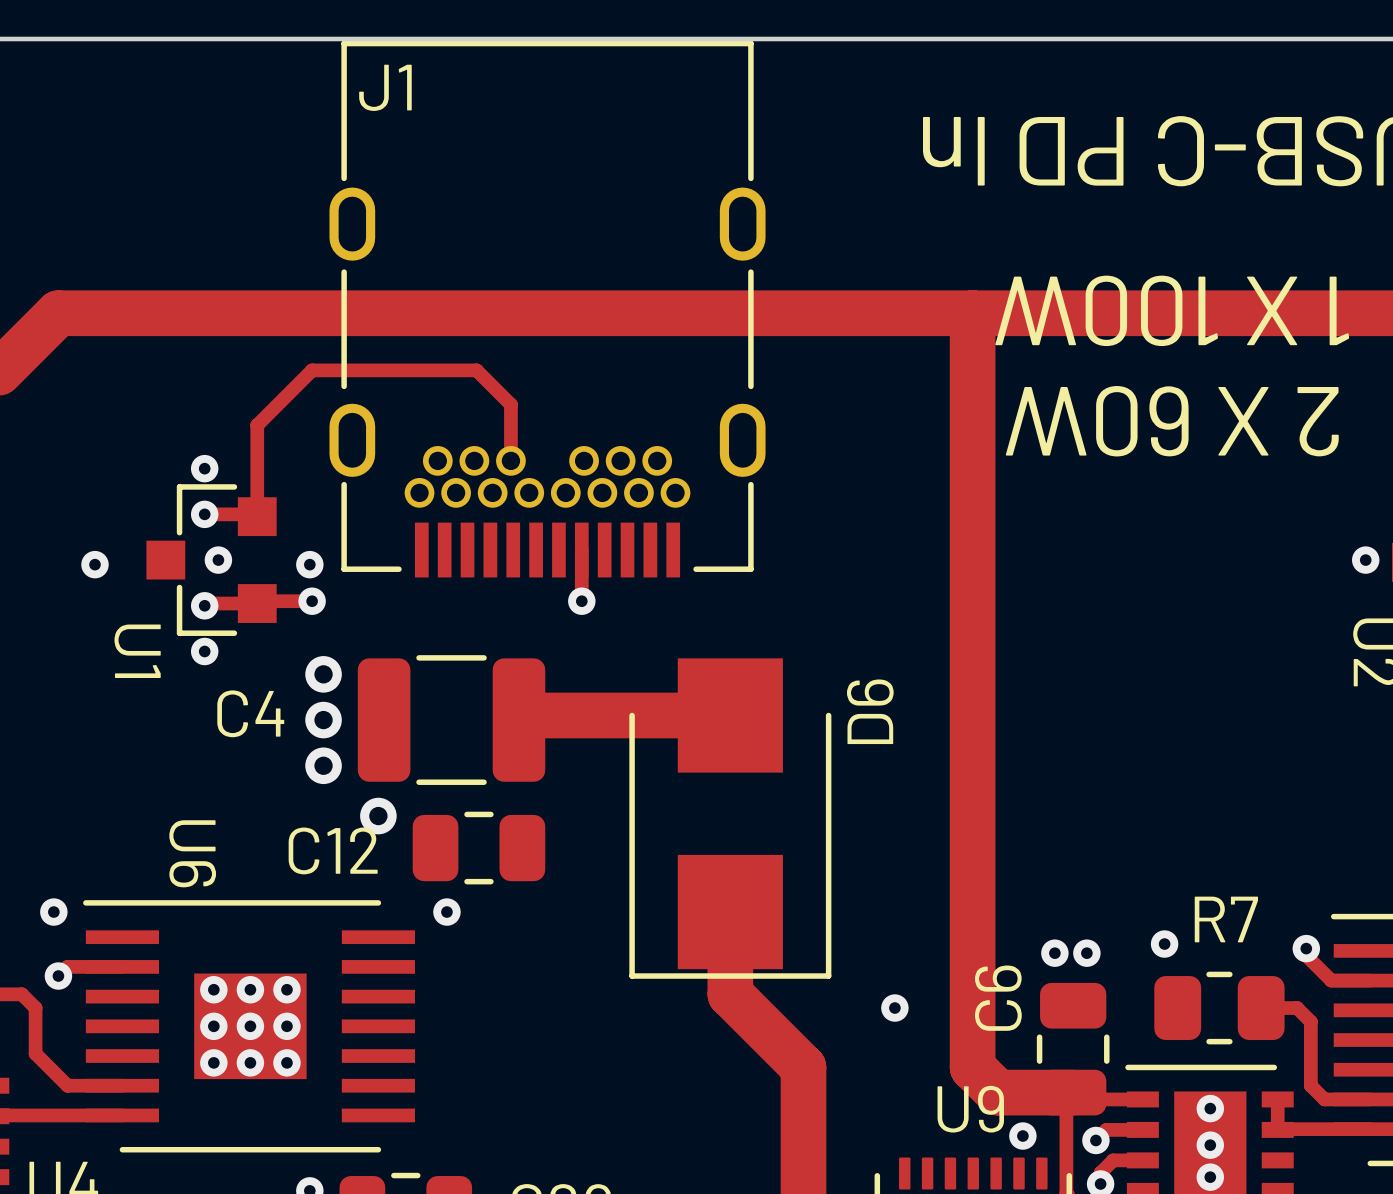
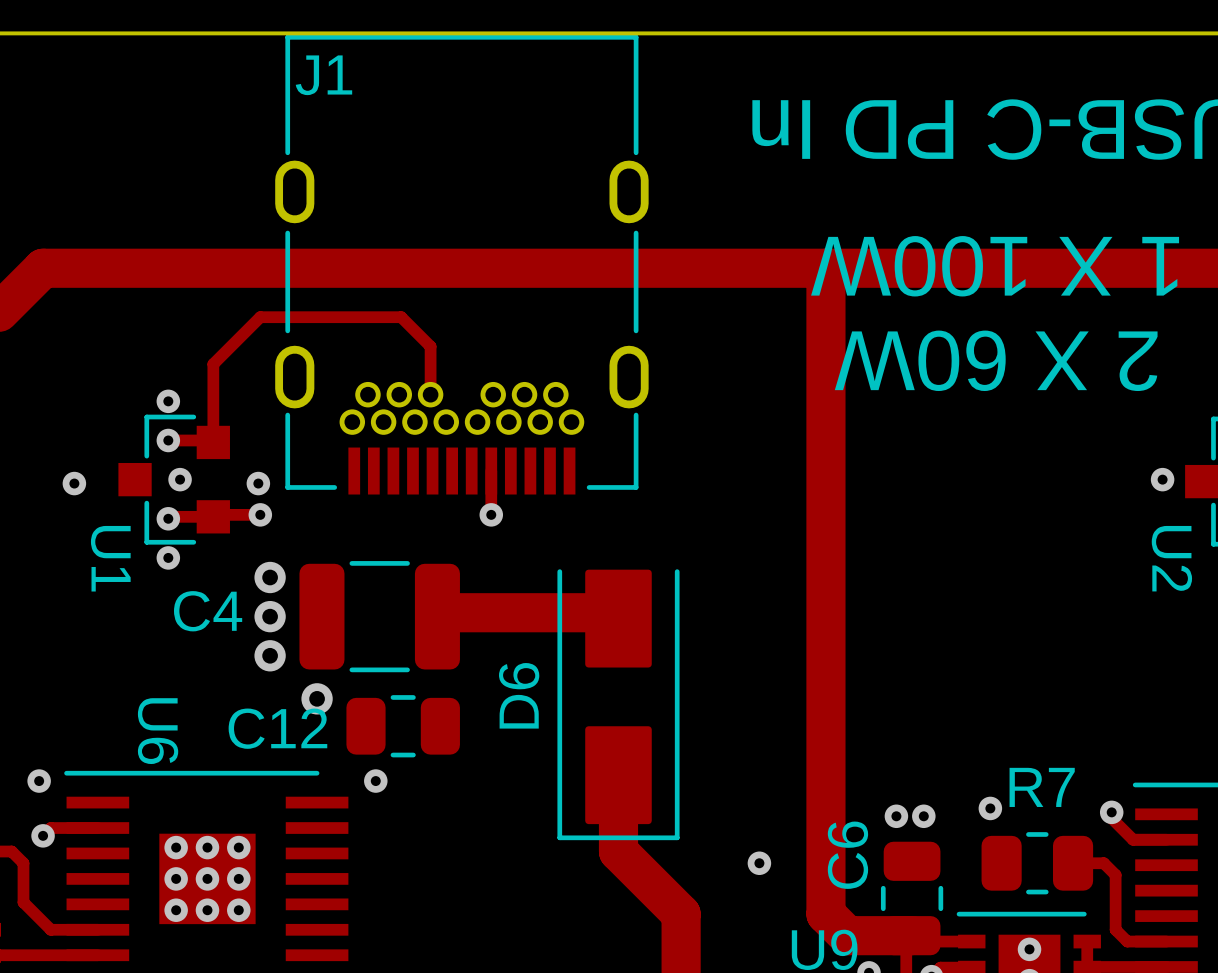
D6 footprint: [629, 658, 832, 979] -> [557, 569, 680, 841]
D6 name position: D6 (870, 711) -> D6 (519, 695)

